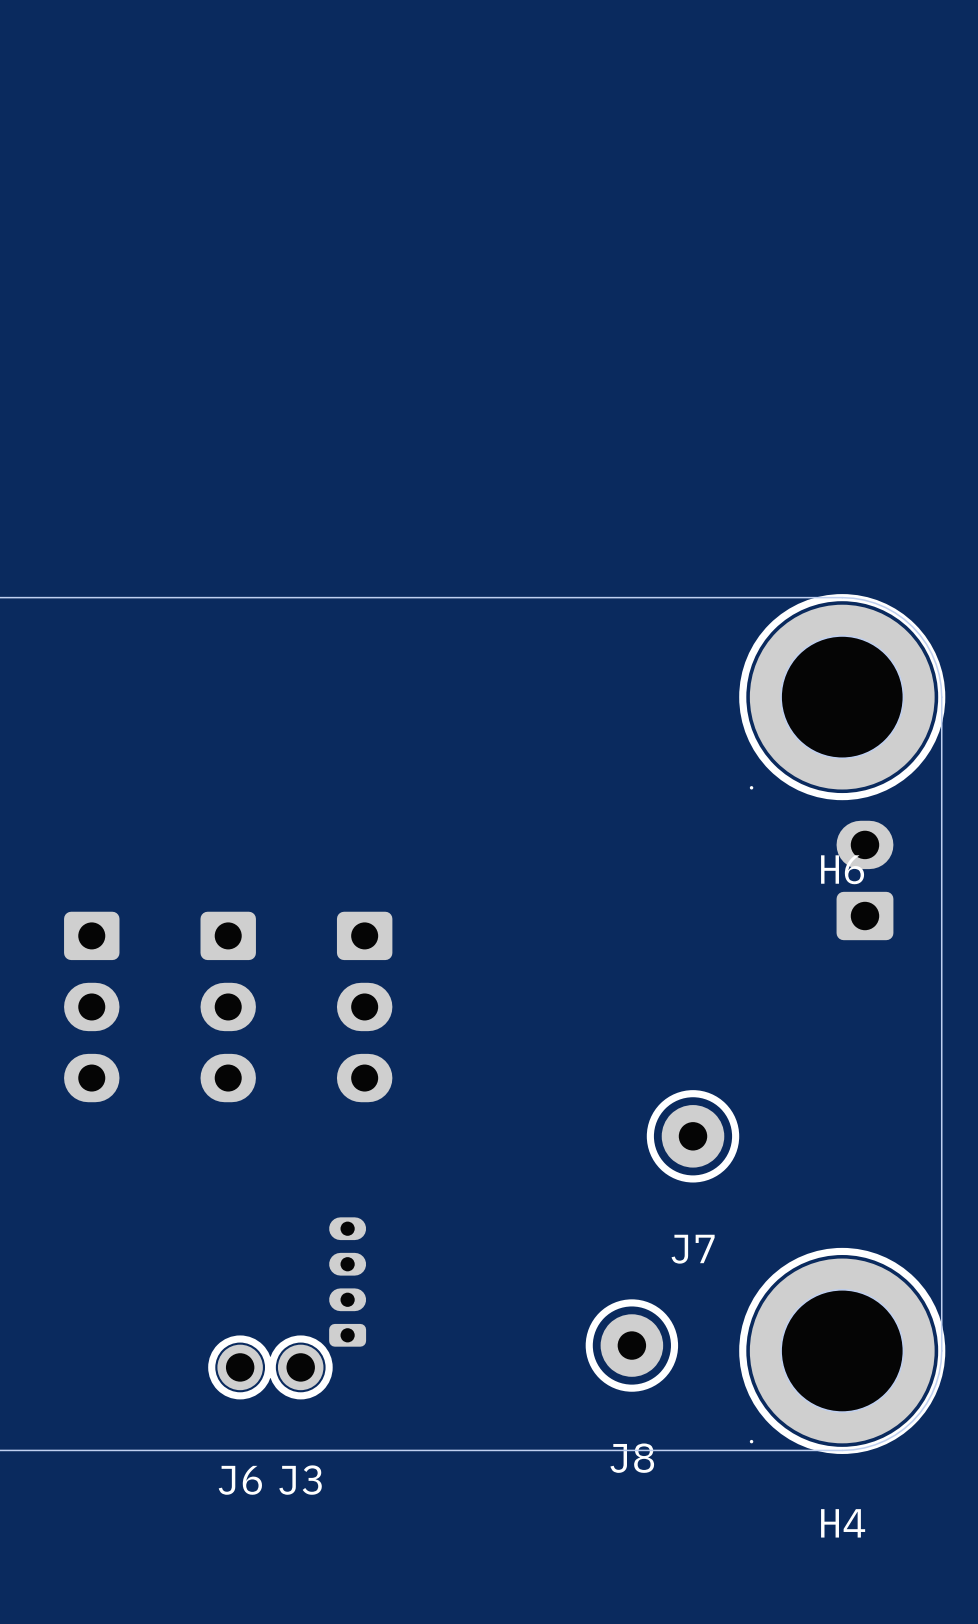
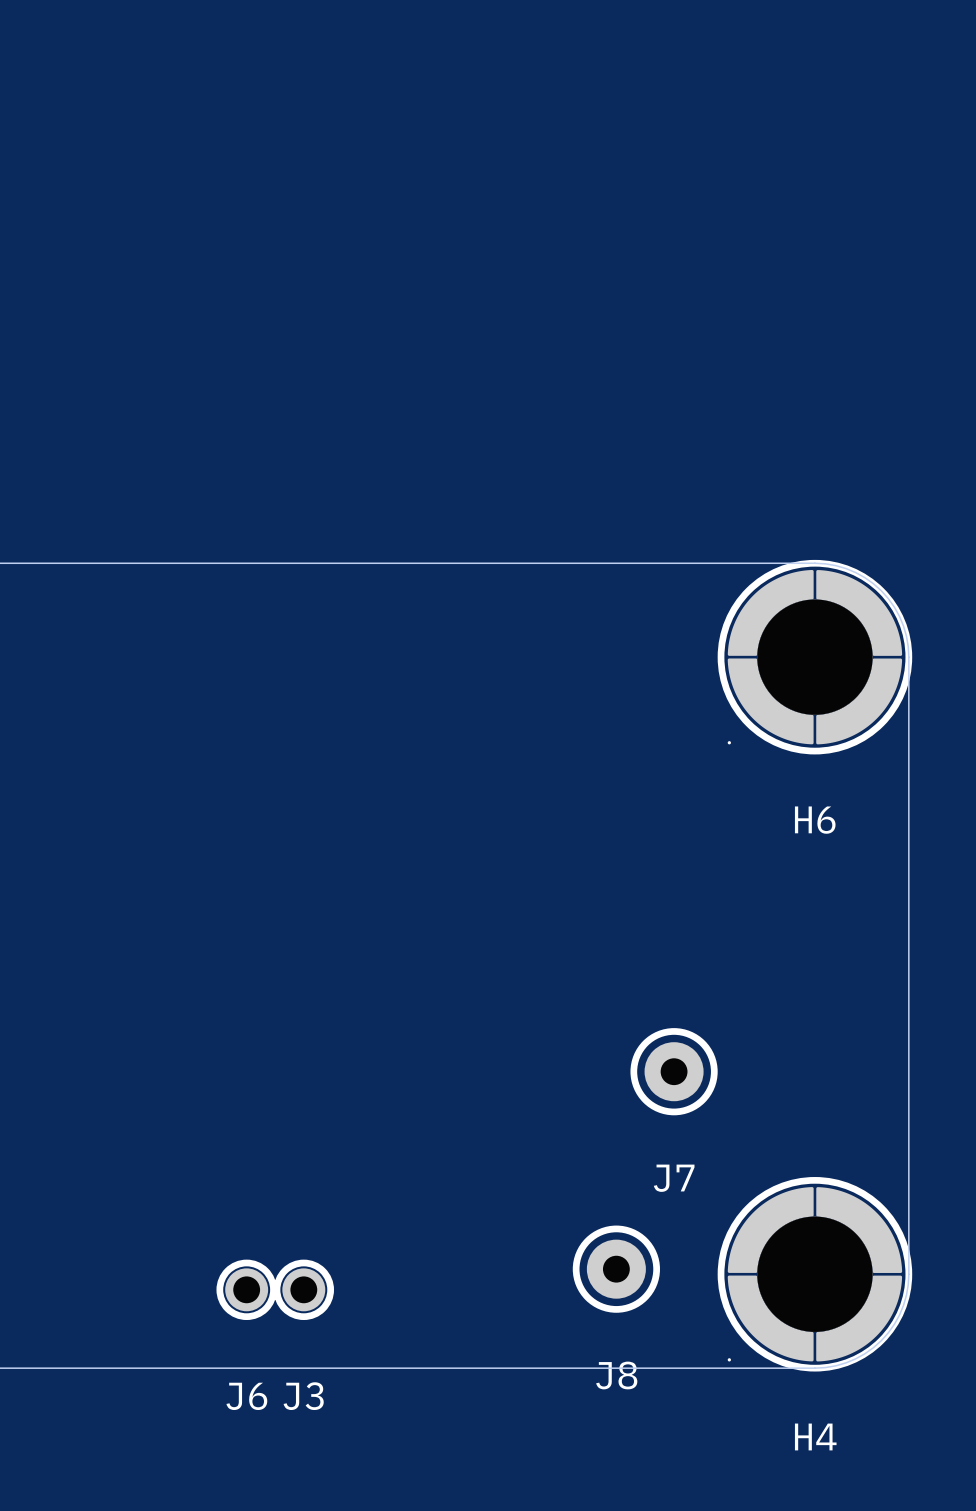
H6 footprint: [739, 594, 946, 801] -> [717, 559, 913, 755]
part: (864, 880) -> none
part: (91, 1006) -> none
part: (228, 1006) -> none
part: (364, 1006) -> none
H4 footprint: [739, 1247, 946, 1454] -> [717, 1177, 913, 1372]
part: (347, 1282) -> none

